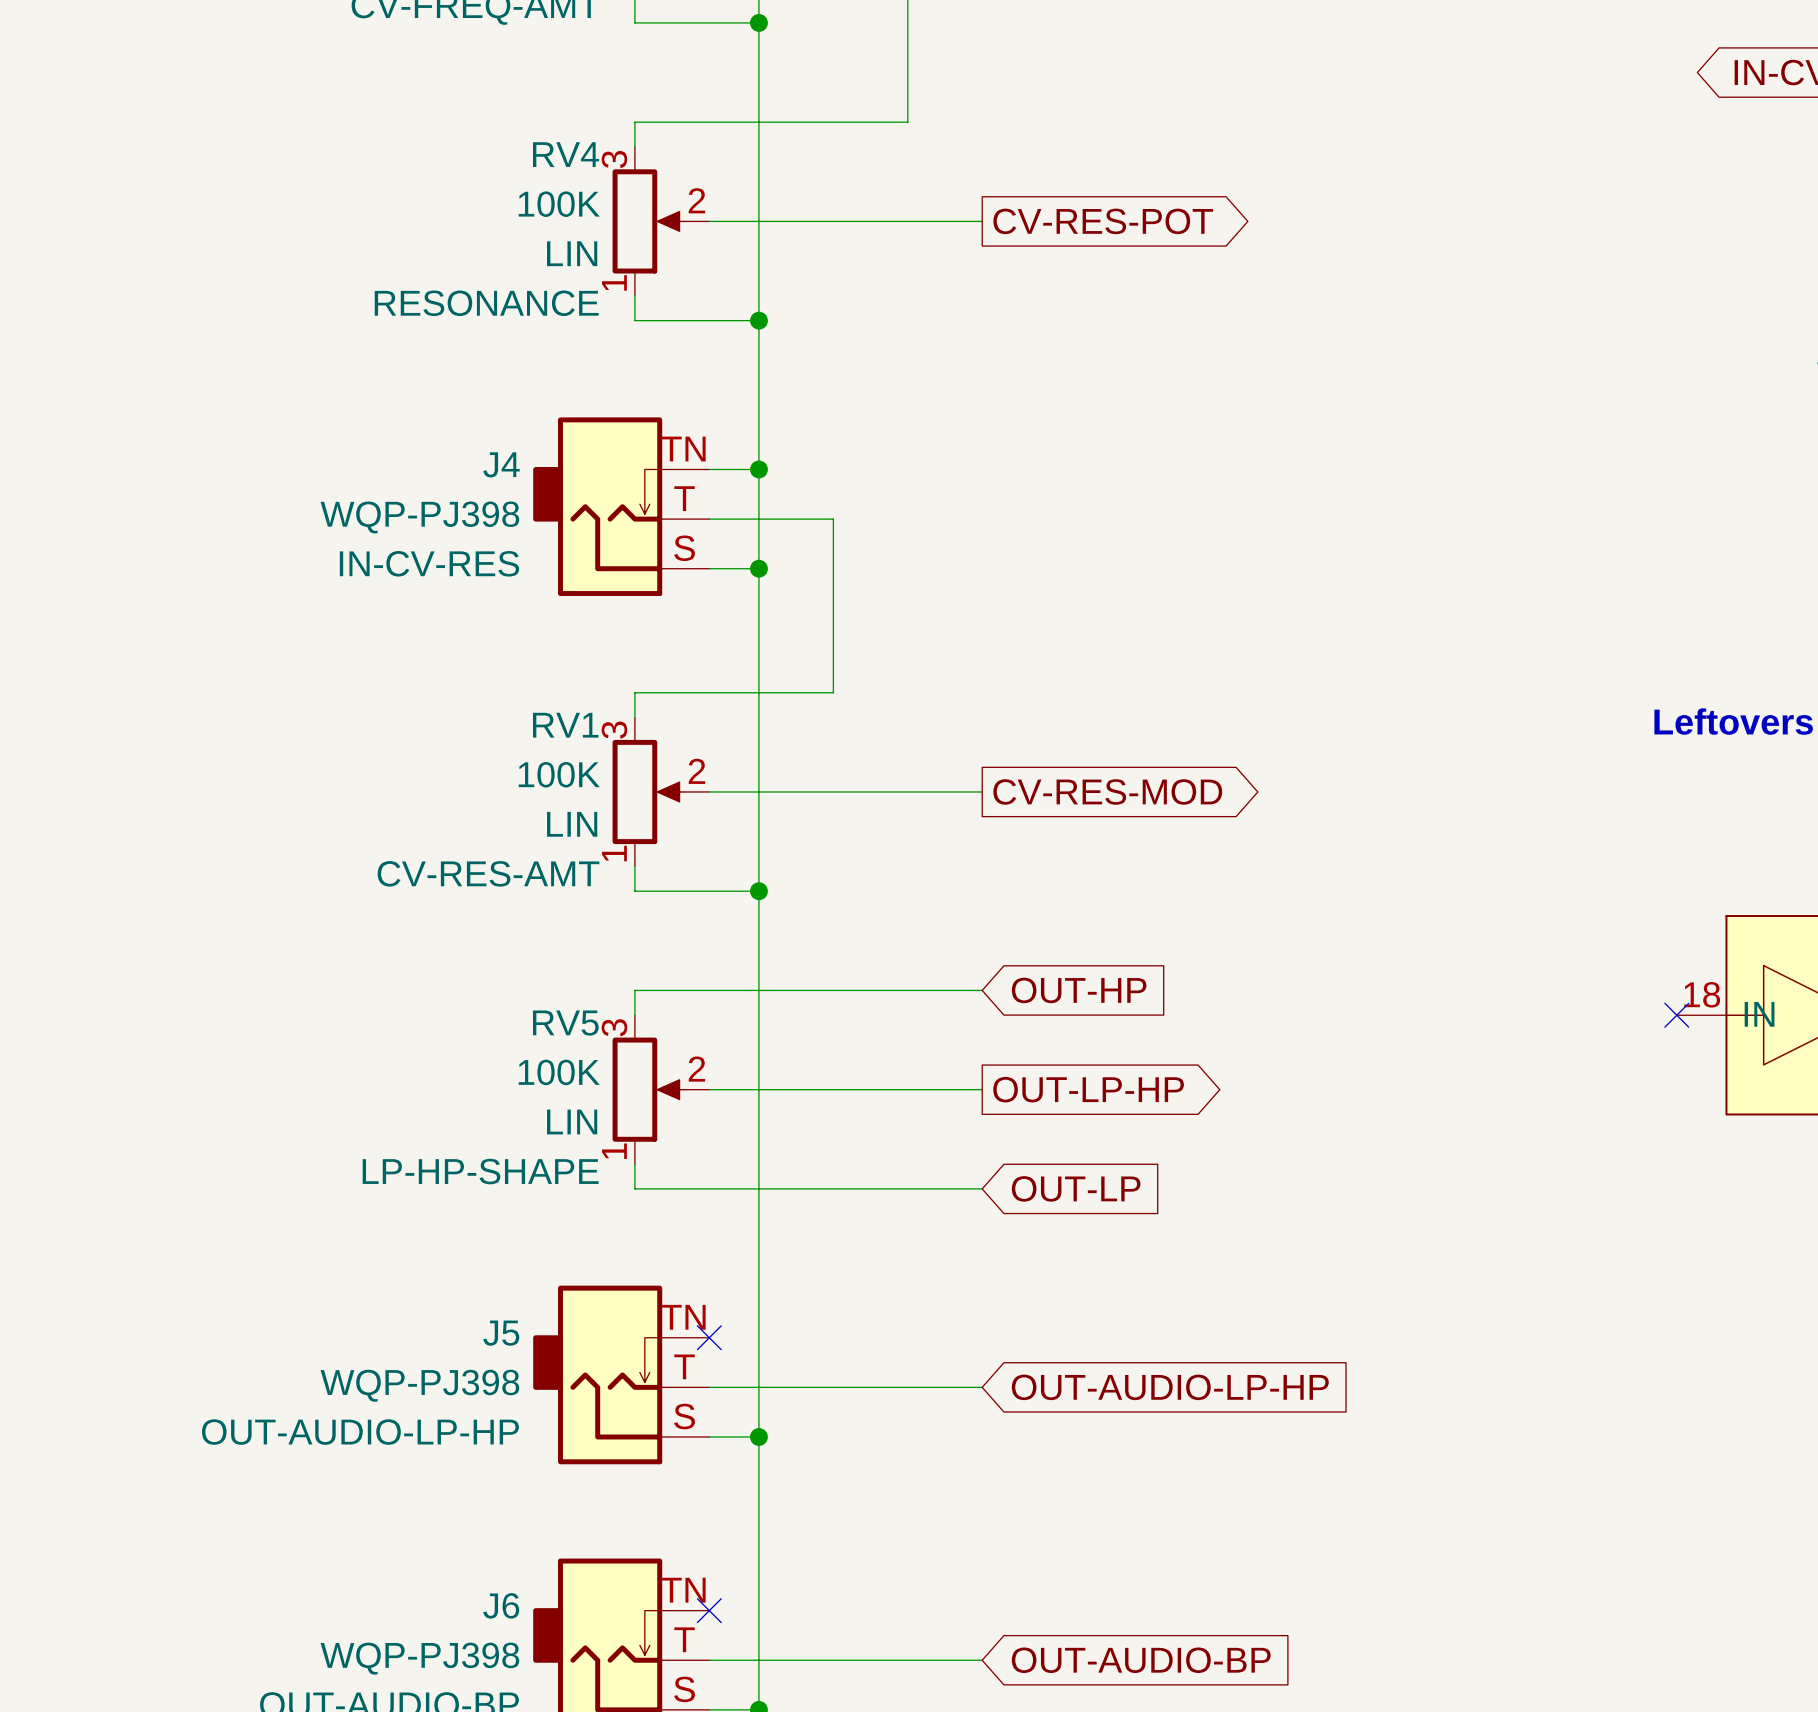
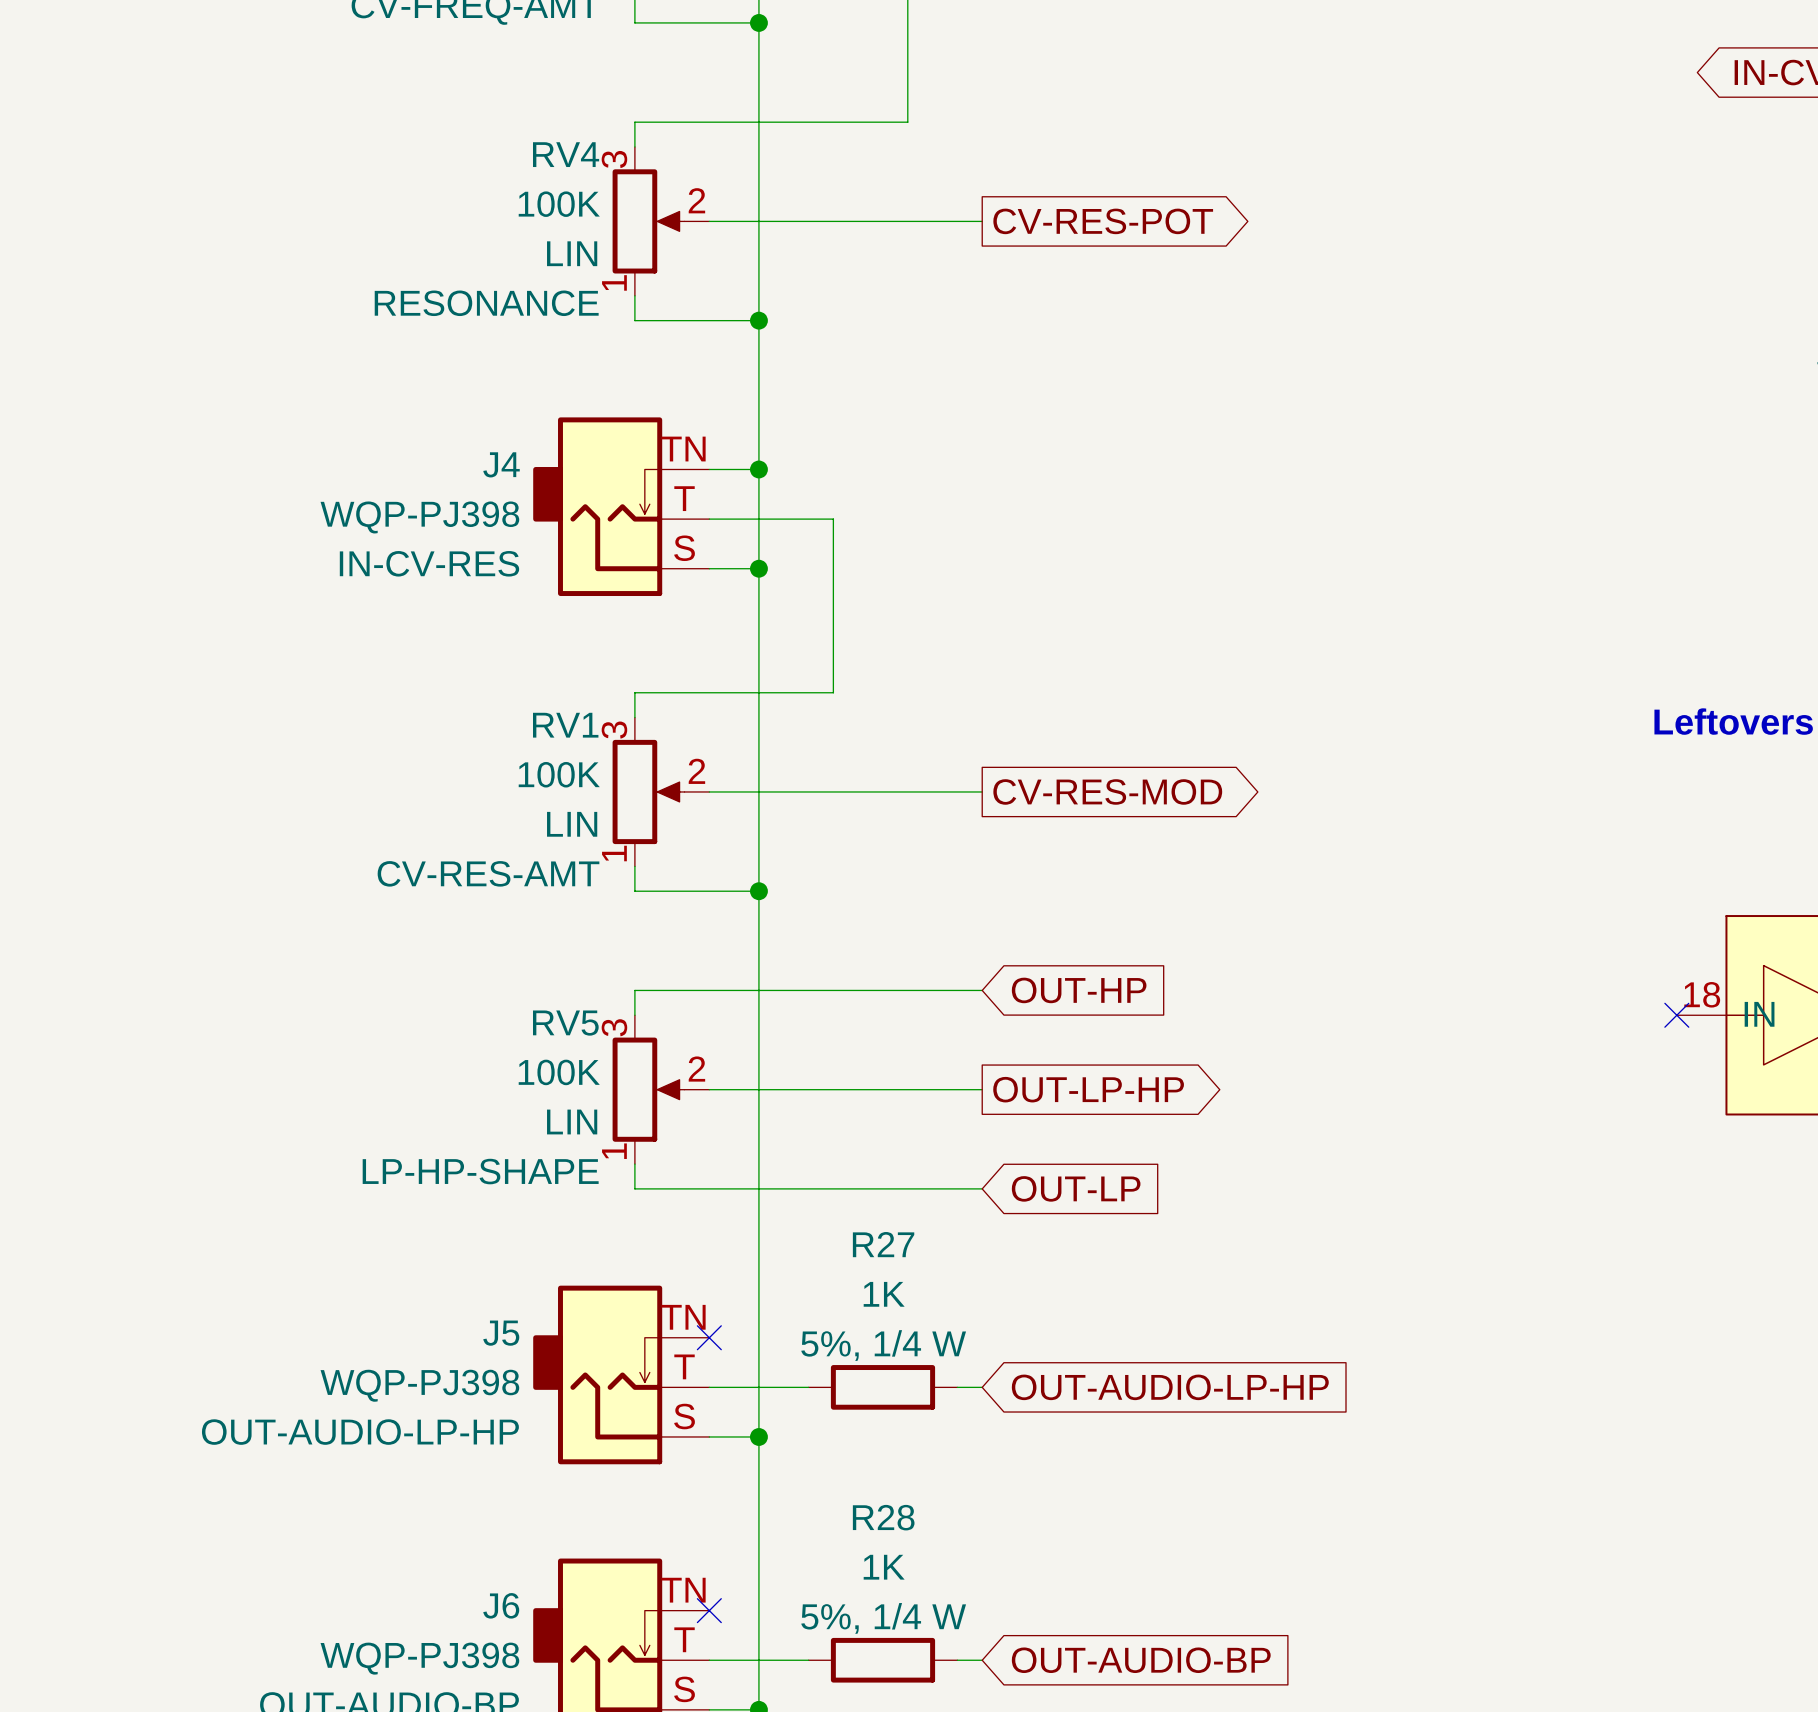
wire: (808, 1387) (957, 1387) -> none
R27: none -> 1K (882, 1387)
wire: (808, 1660) (957, 1660) -> none
R28: none -> 1K (882, 1660)

